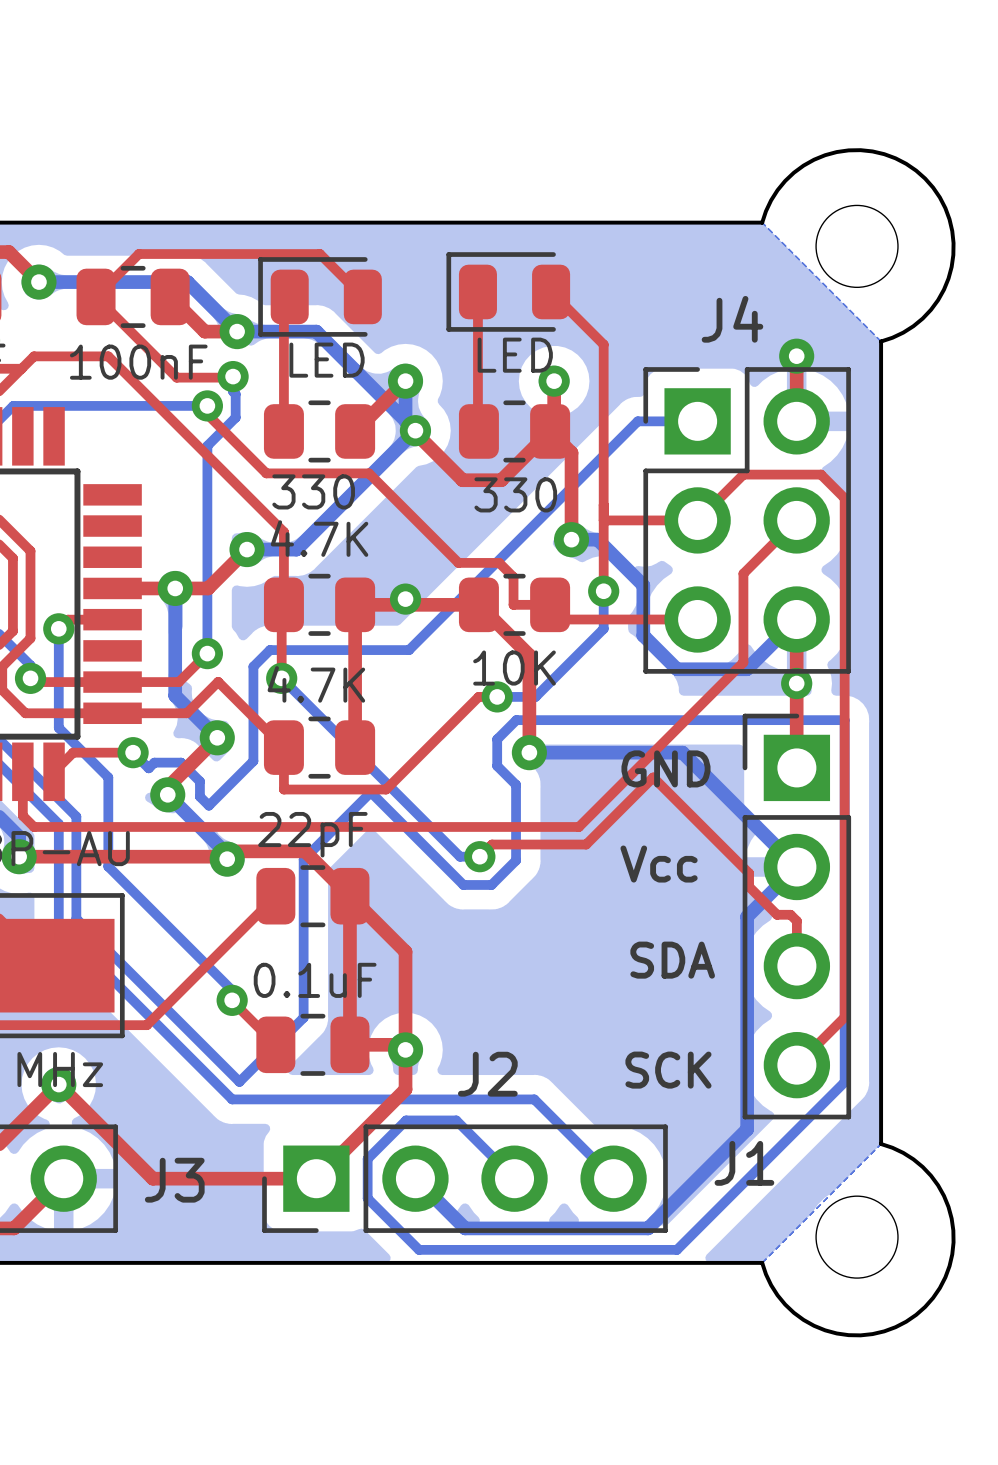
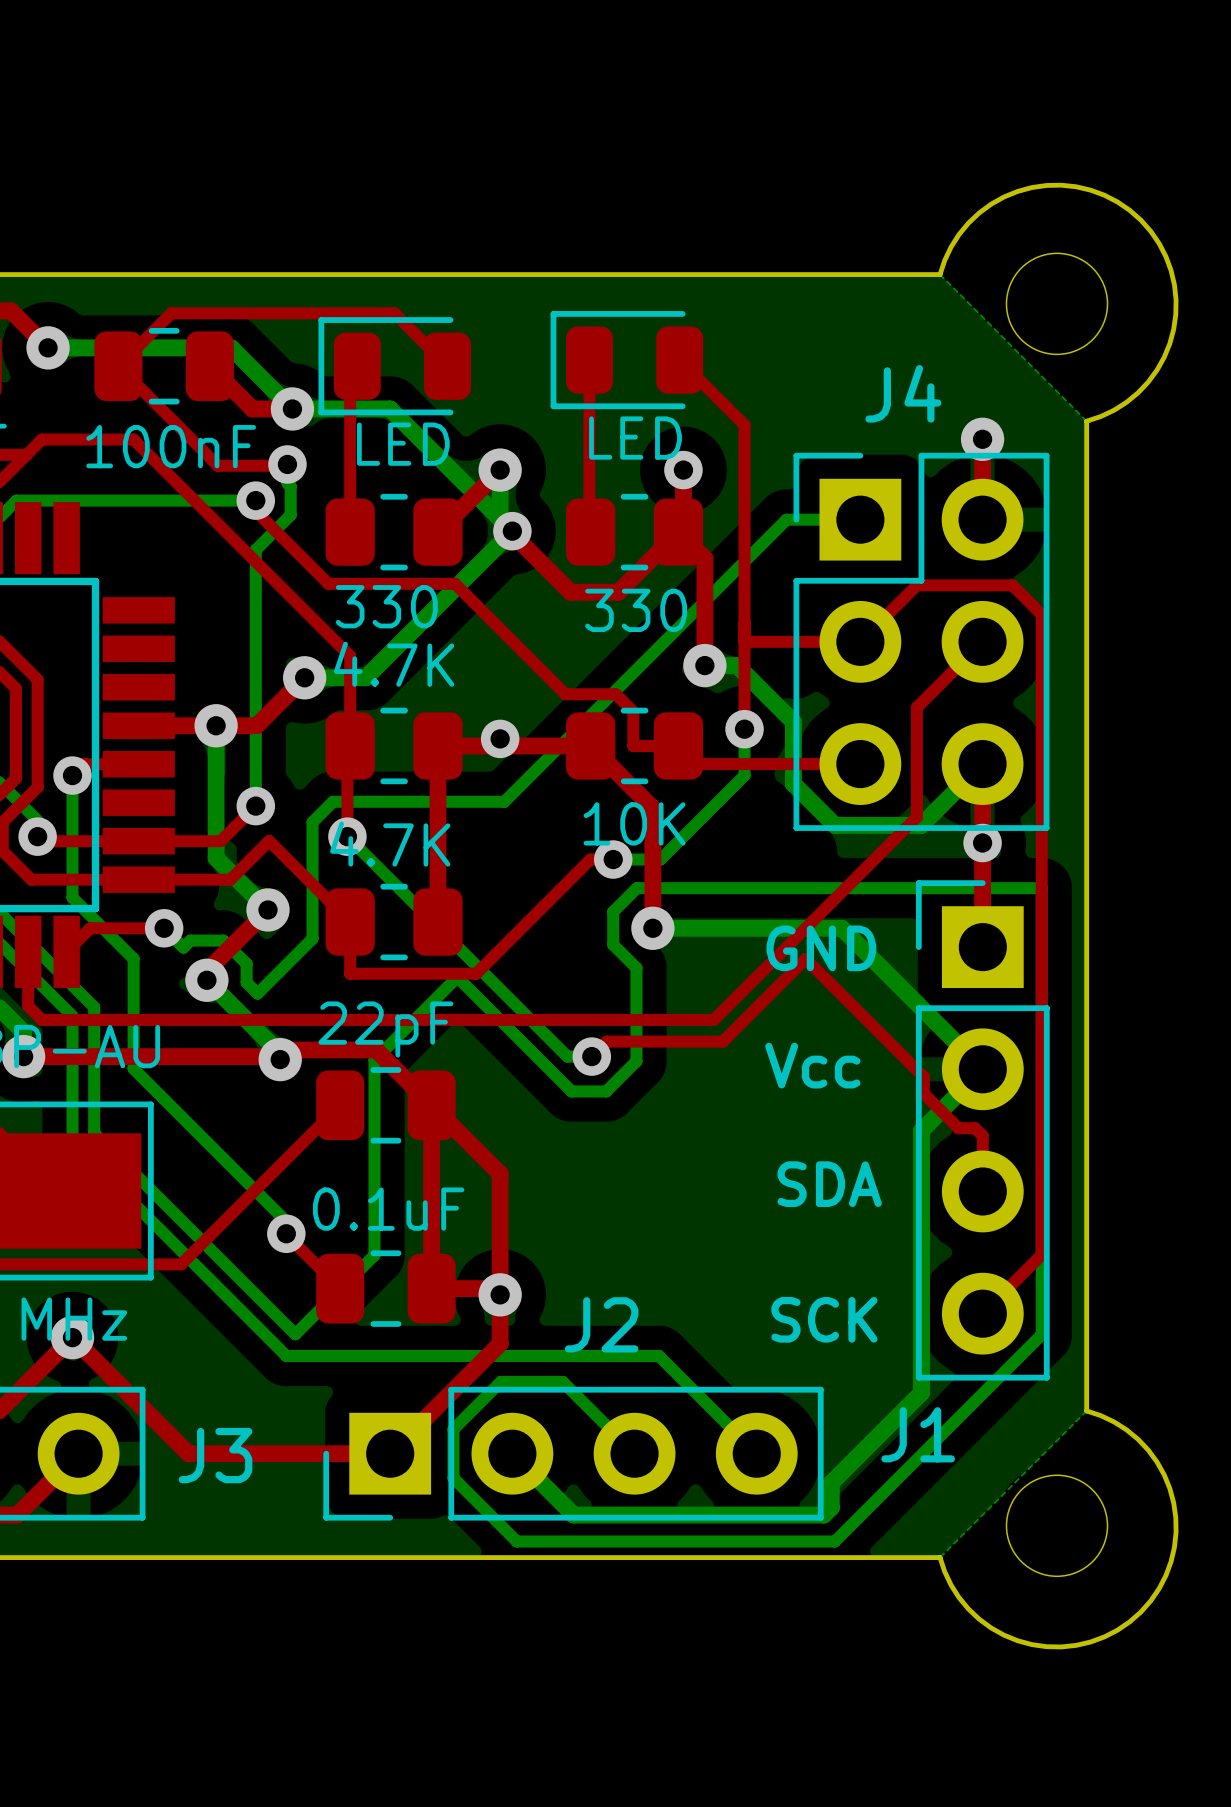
bottom track: (674, 1202) (648, 1228) -> (831, 1483) (831, 1507) (823, 1515) (799, 1515)

